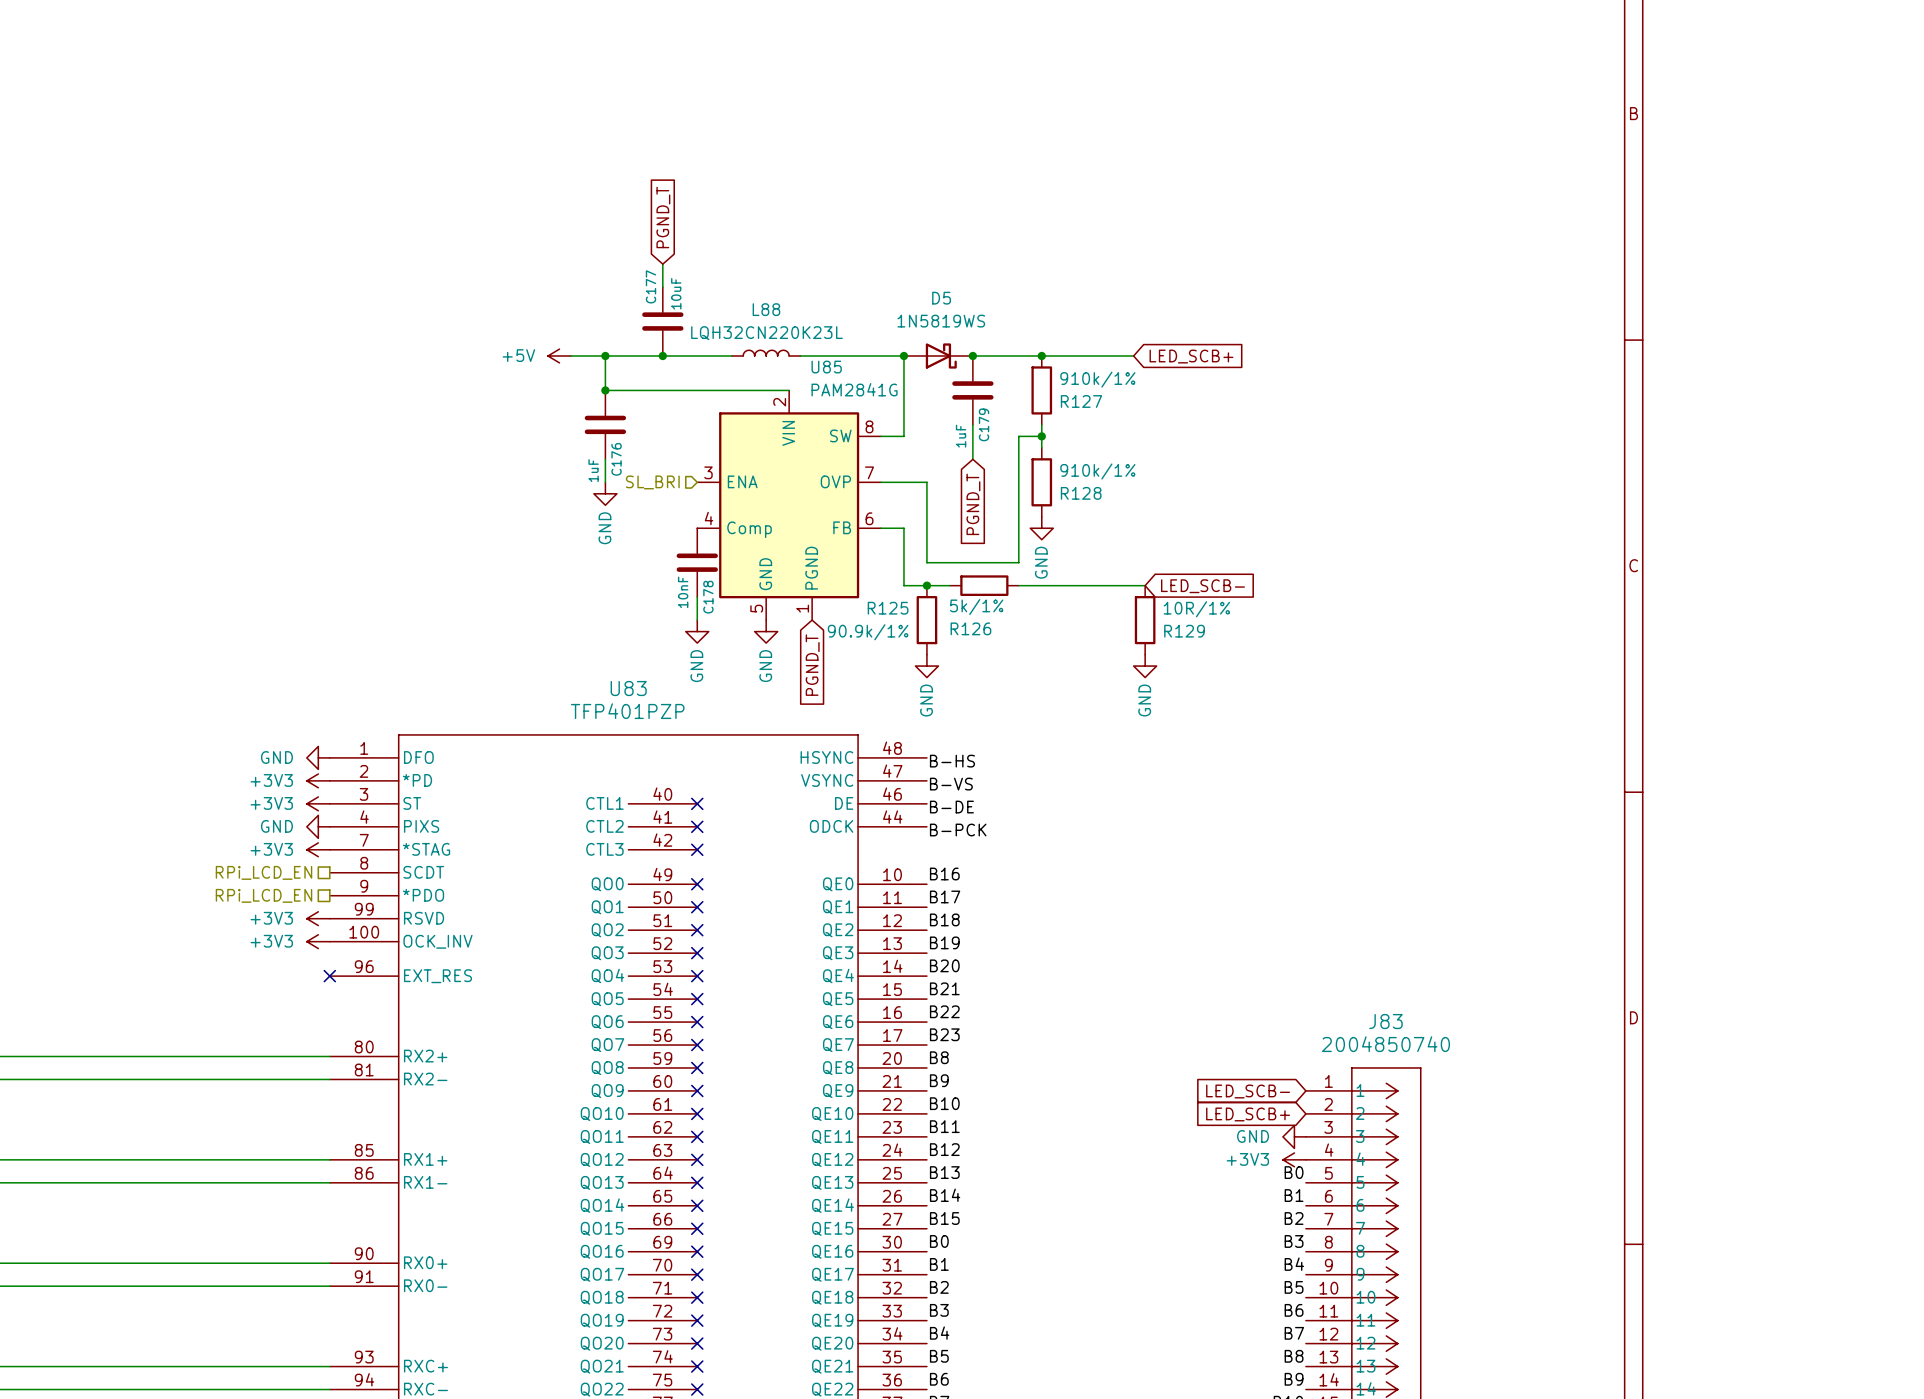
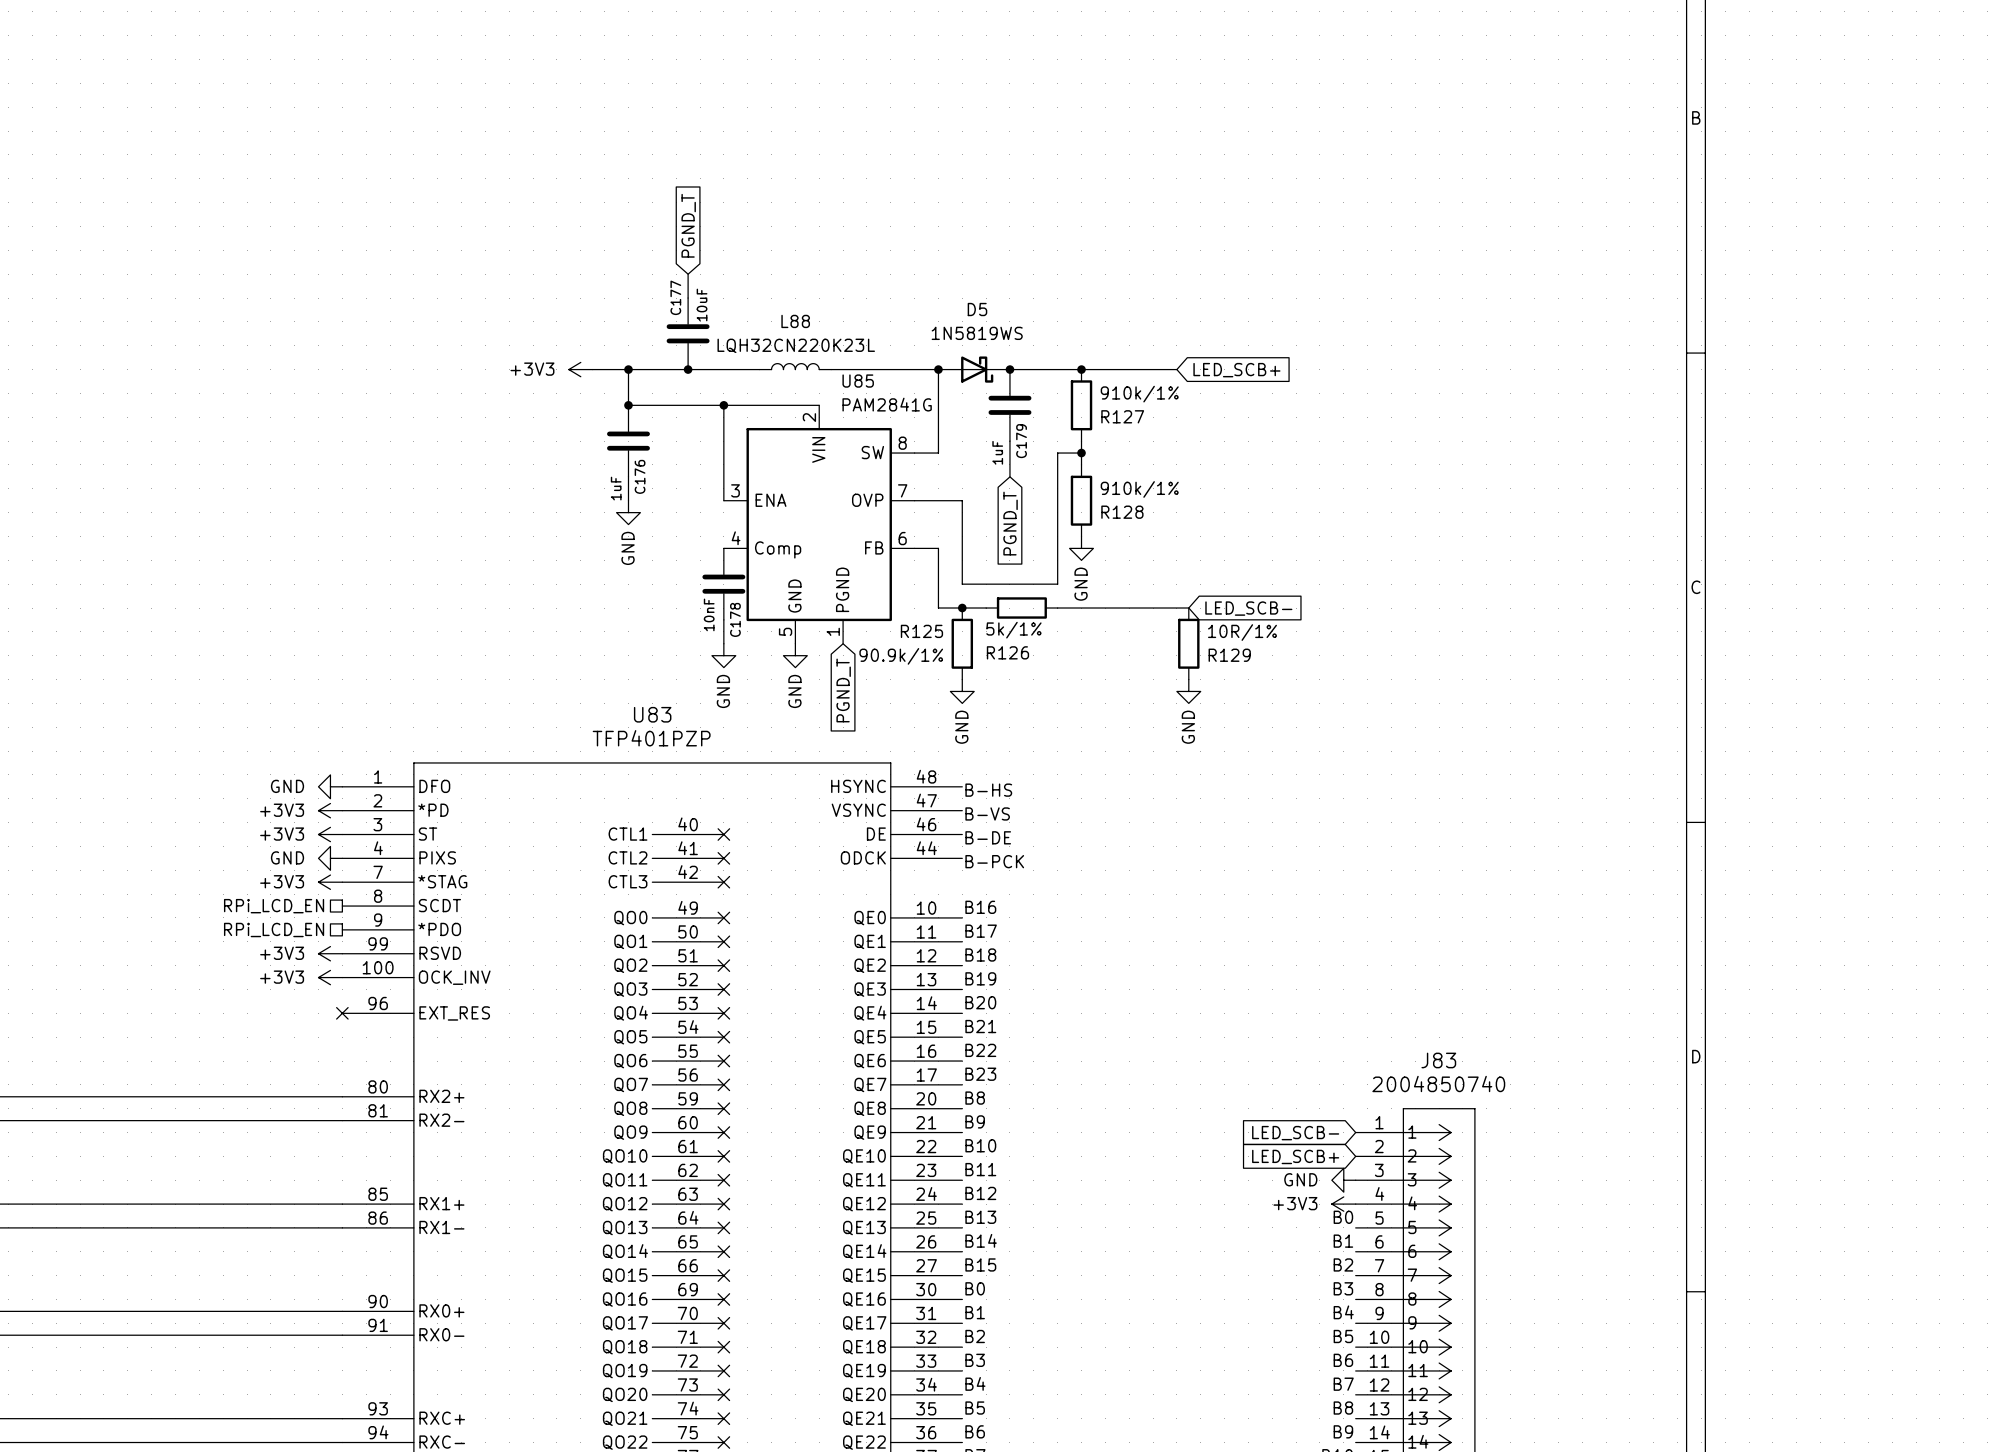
power symbol: +5V (559, 355) -> +3V3 (580, 369)
wire: none -> (723, 405) (723, 500)
junction: none -> (723, 405)
hierarchical label: SL_BRI (652, 482) -> none

